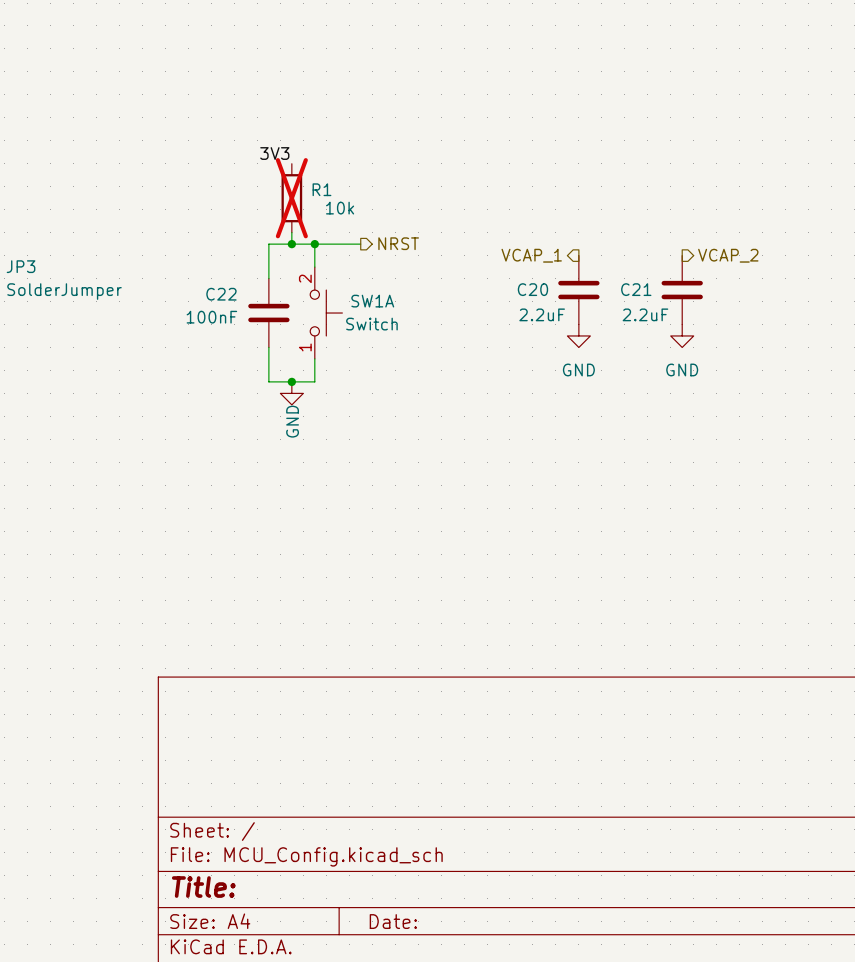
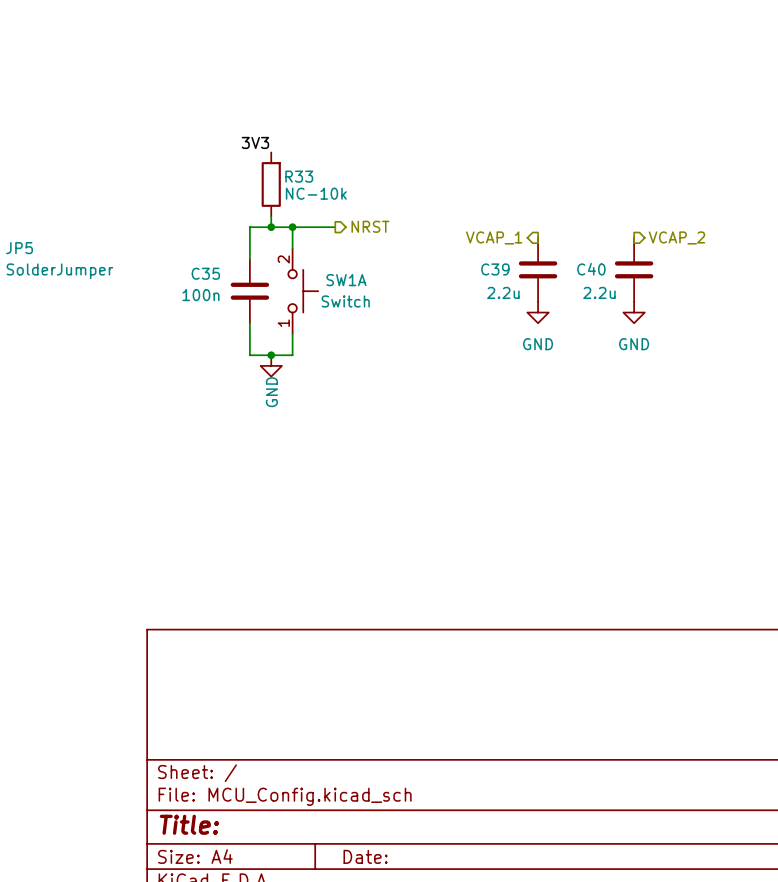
R1 name: R1 (321, 189) -> R33 (299, 176)
R1 do-not-place cross: (291, 198) -> none
R1 value: 10k (340, 208) -> NC-10k (316, 193)
JP3 name: JP3 (21, 266) -> JP5 (19, 248)
C20 name: C20 (532, 289) -> C39 (495, 269)
C21 name: C21 (636, 289) -> C40 (591, 269)
C22 name: C22 (221, 294) -> C35 (205, 273)
C20 value: 2.2uF (542, 314) -> 2.2u (503, 292)
C21 value: 2.2uF (645, 314) -> 2.2u (599, 292)
C22 value: 100nF (211, 317) -> 100n (200, 295)

